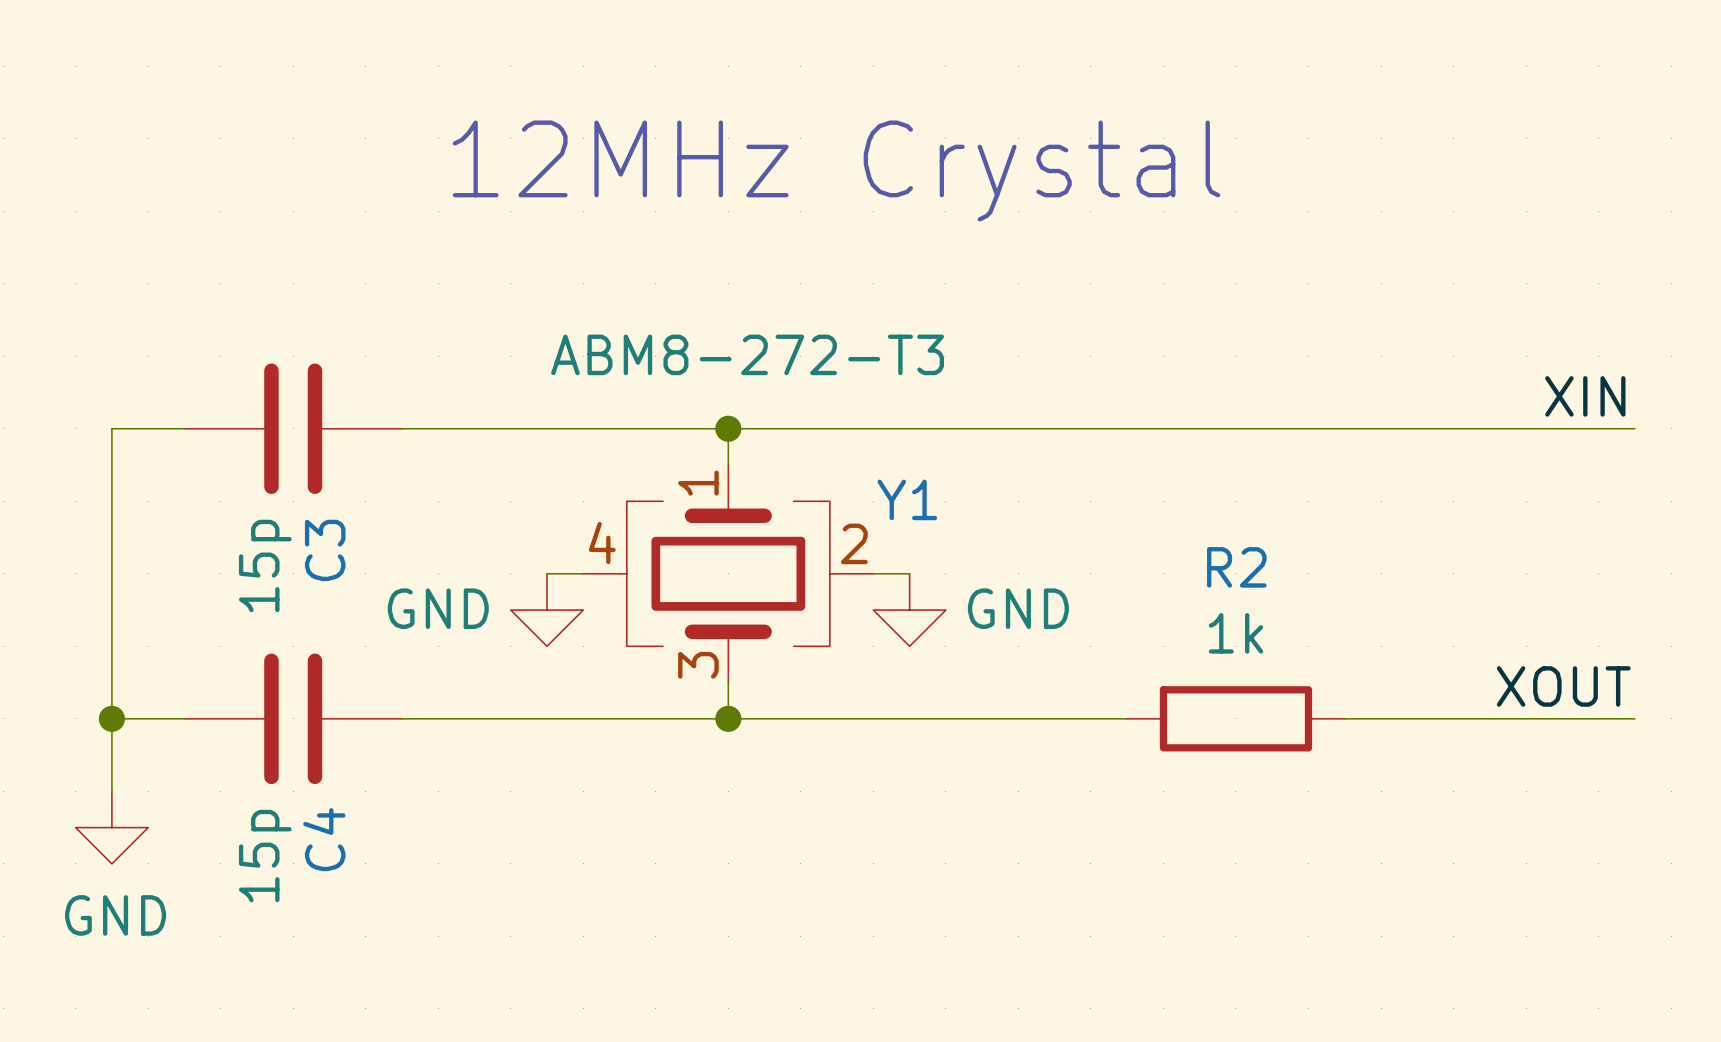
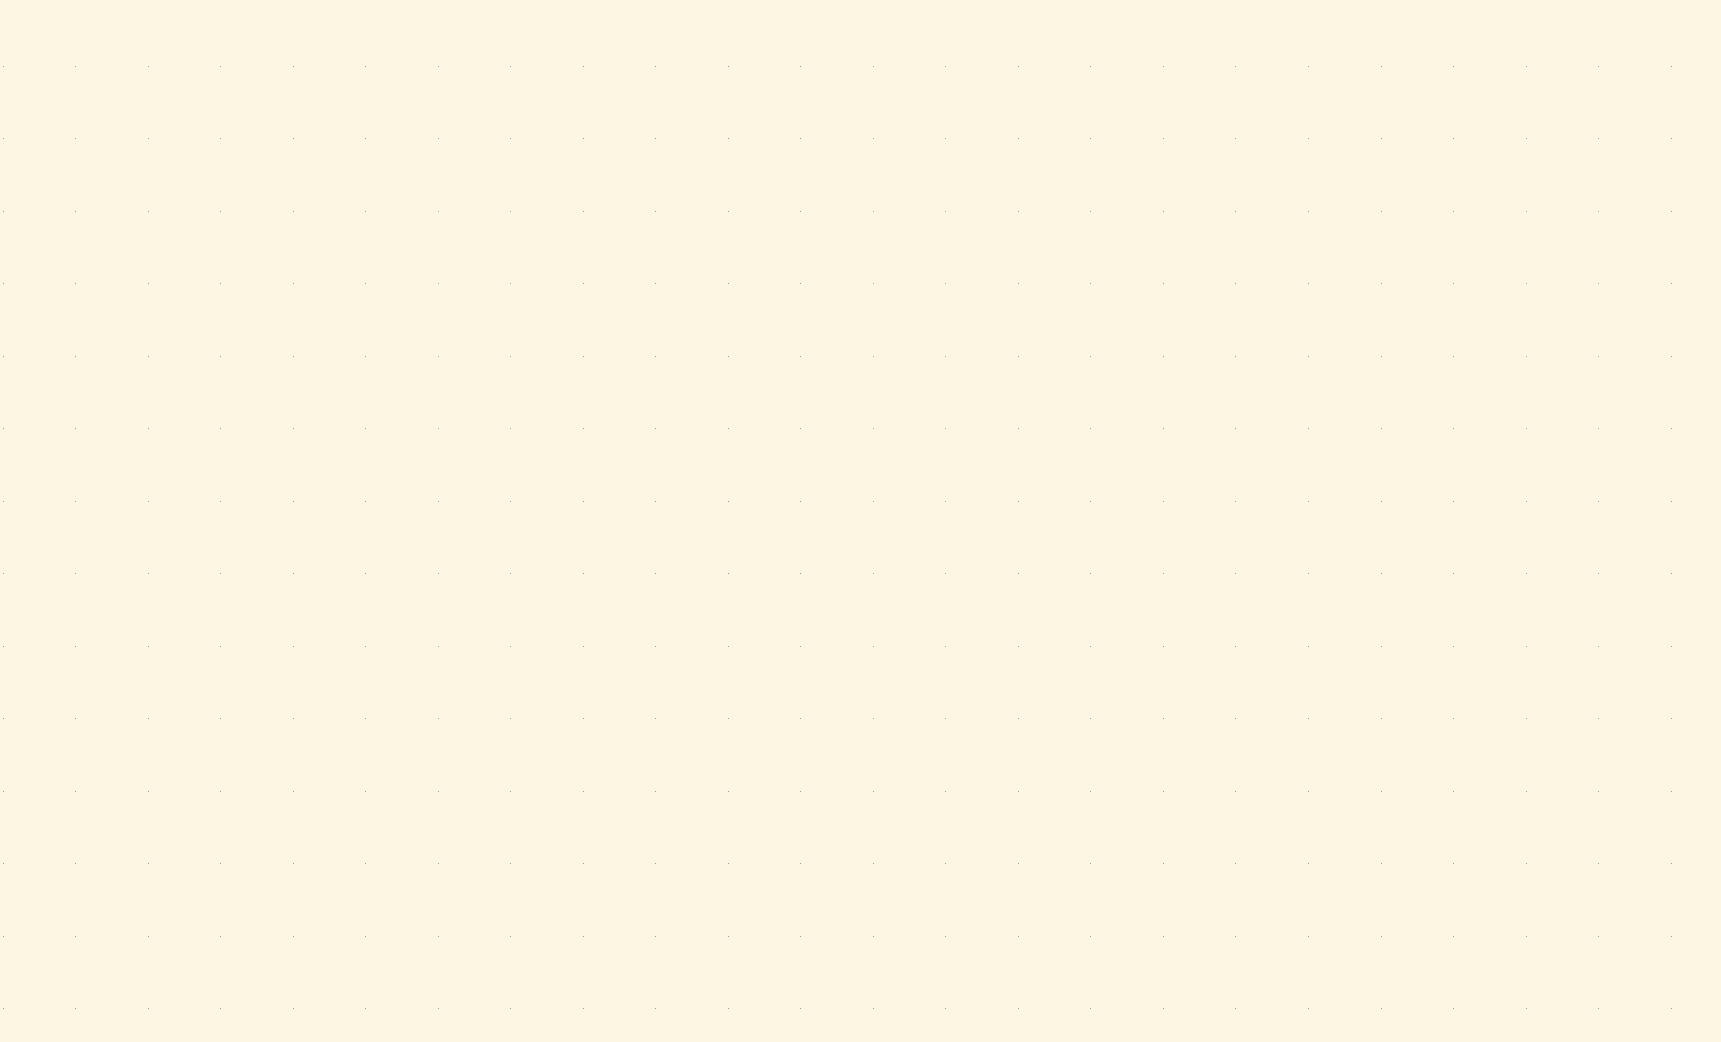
text: 12MHz Crystal (836, 171) -> none
label: XIN (1585, 396) -> none
wire: (184, 428) (111, 428) (111, 791) -> none
C3: 15p (293, 428) -> none
wire: (401, 428) (1634, 428) -> none
wire: (728, 428) (728, 465) -> none
junction: (728, 428) -> none
wire: (547, 573) (583, 573) -> none
Y1: ABM8-272-T3 (728, 573) -> none
wire: (873, 573) (909, 573) -> none
power symbol: GND (547, 610) -> none
power symbol: GND (909, 610) -> none
wire: (728, 682) (728, 718) -> none
label: XOUT (1563, 686) -> none
wire: (111, 718) (184, 718) -> none
junction: (111, 718) -> none
C4: 15p (293, 718) -> none
wire: (401, 718) (1127, 718) -> none
junction: (728, 718) -> none
R2: 1k (1235, 718) -> none
wire: (1344, 718) (1634, 718) -> none
power symbol: GND (111, 827) -> none

